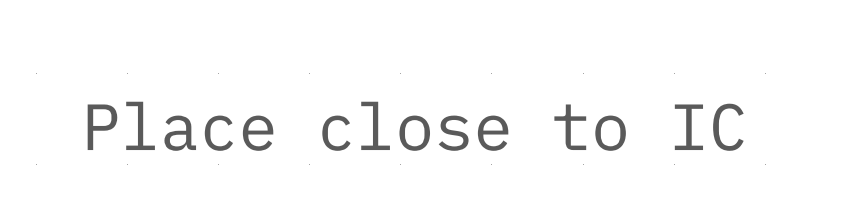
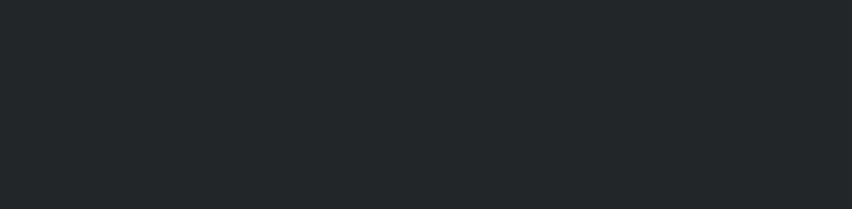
text: Place close to IC (415, 126) -> none

